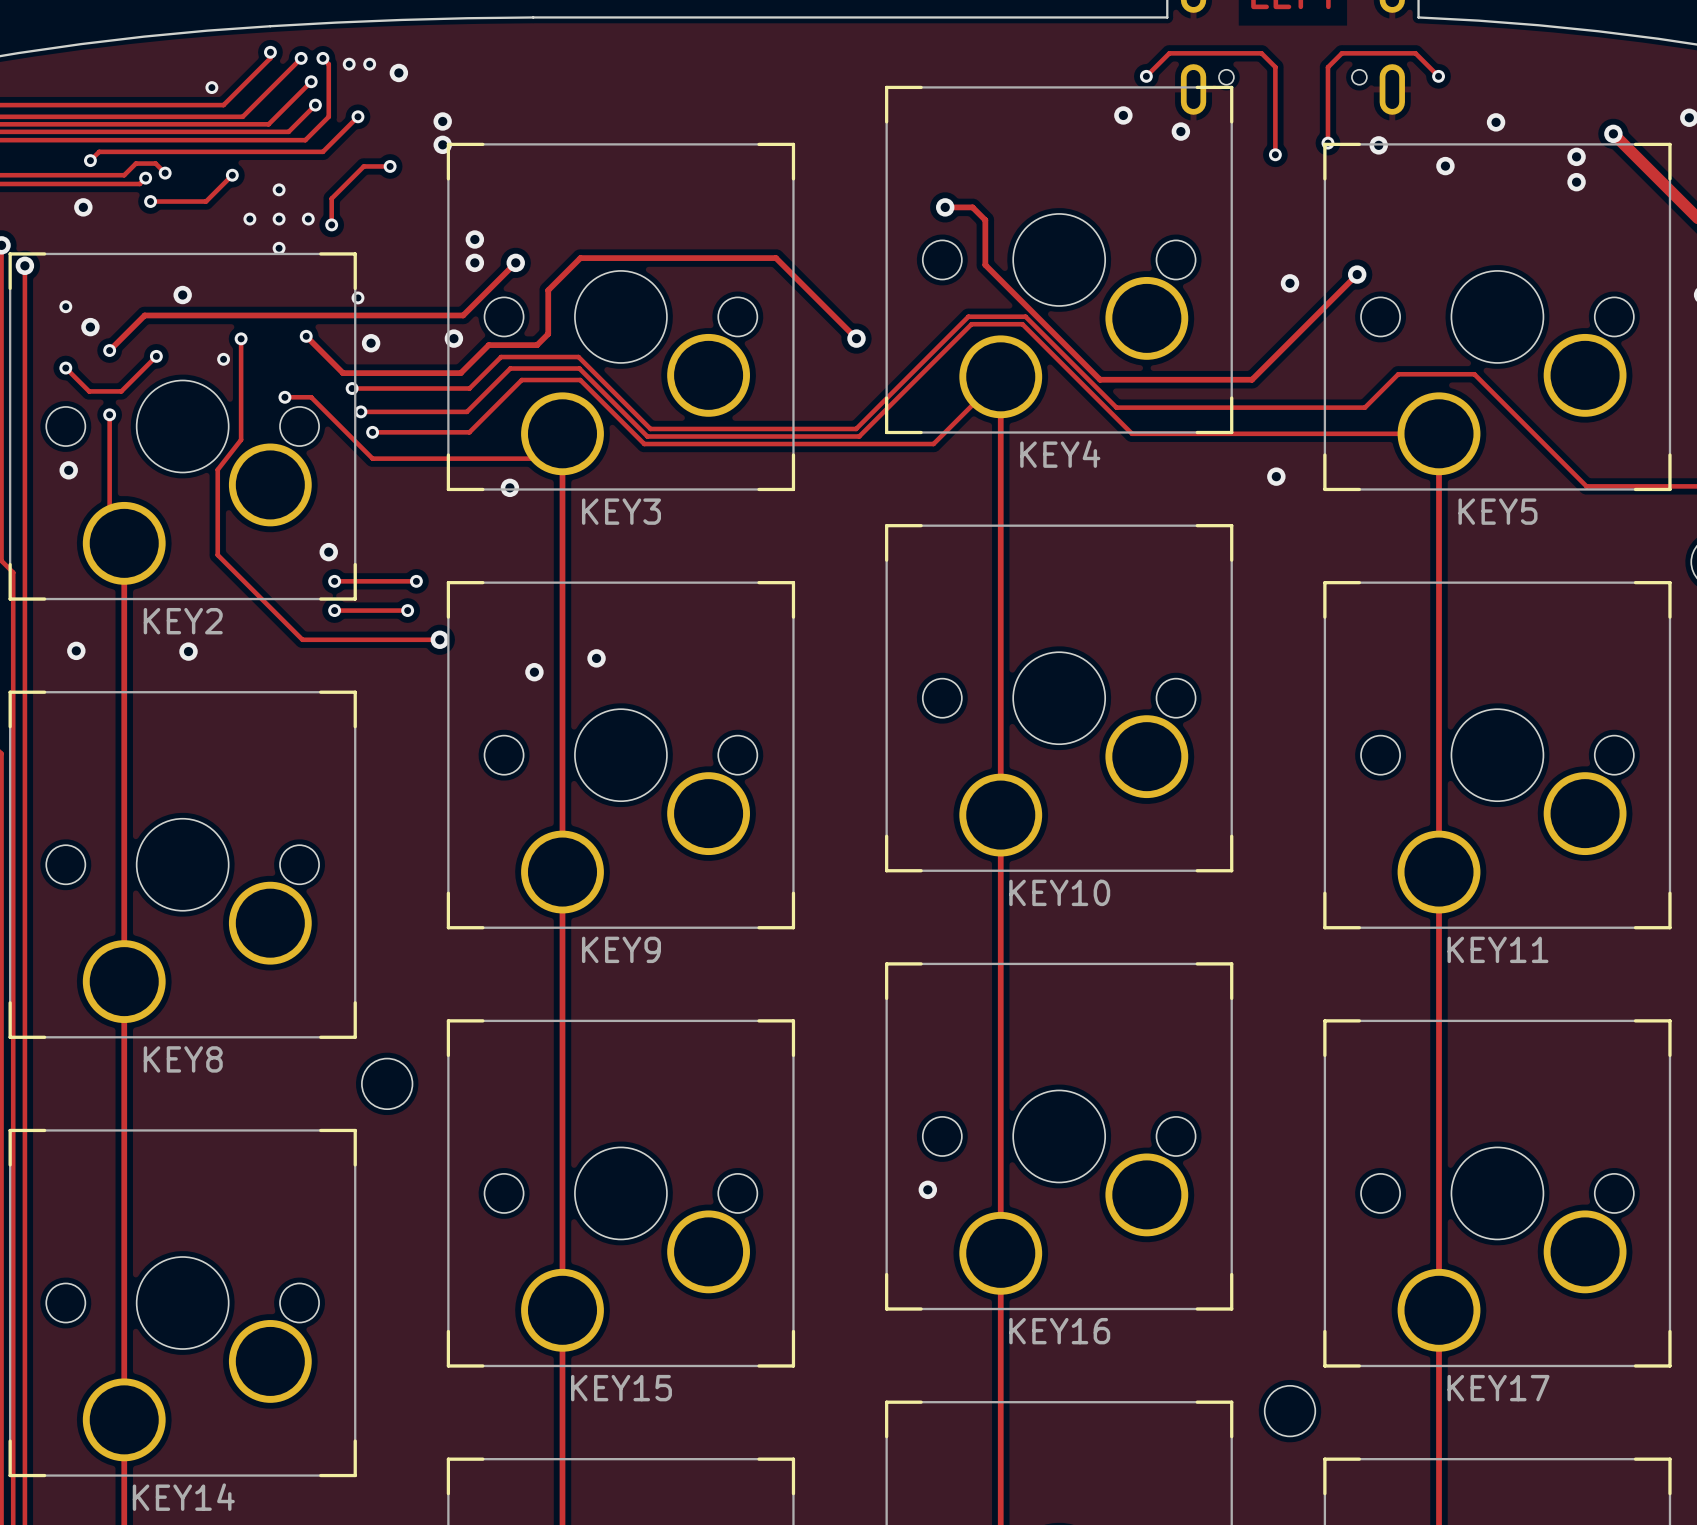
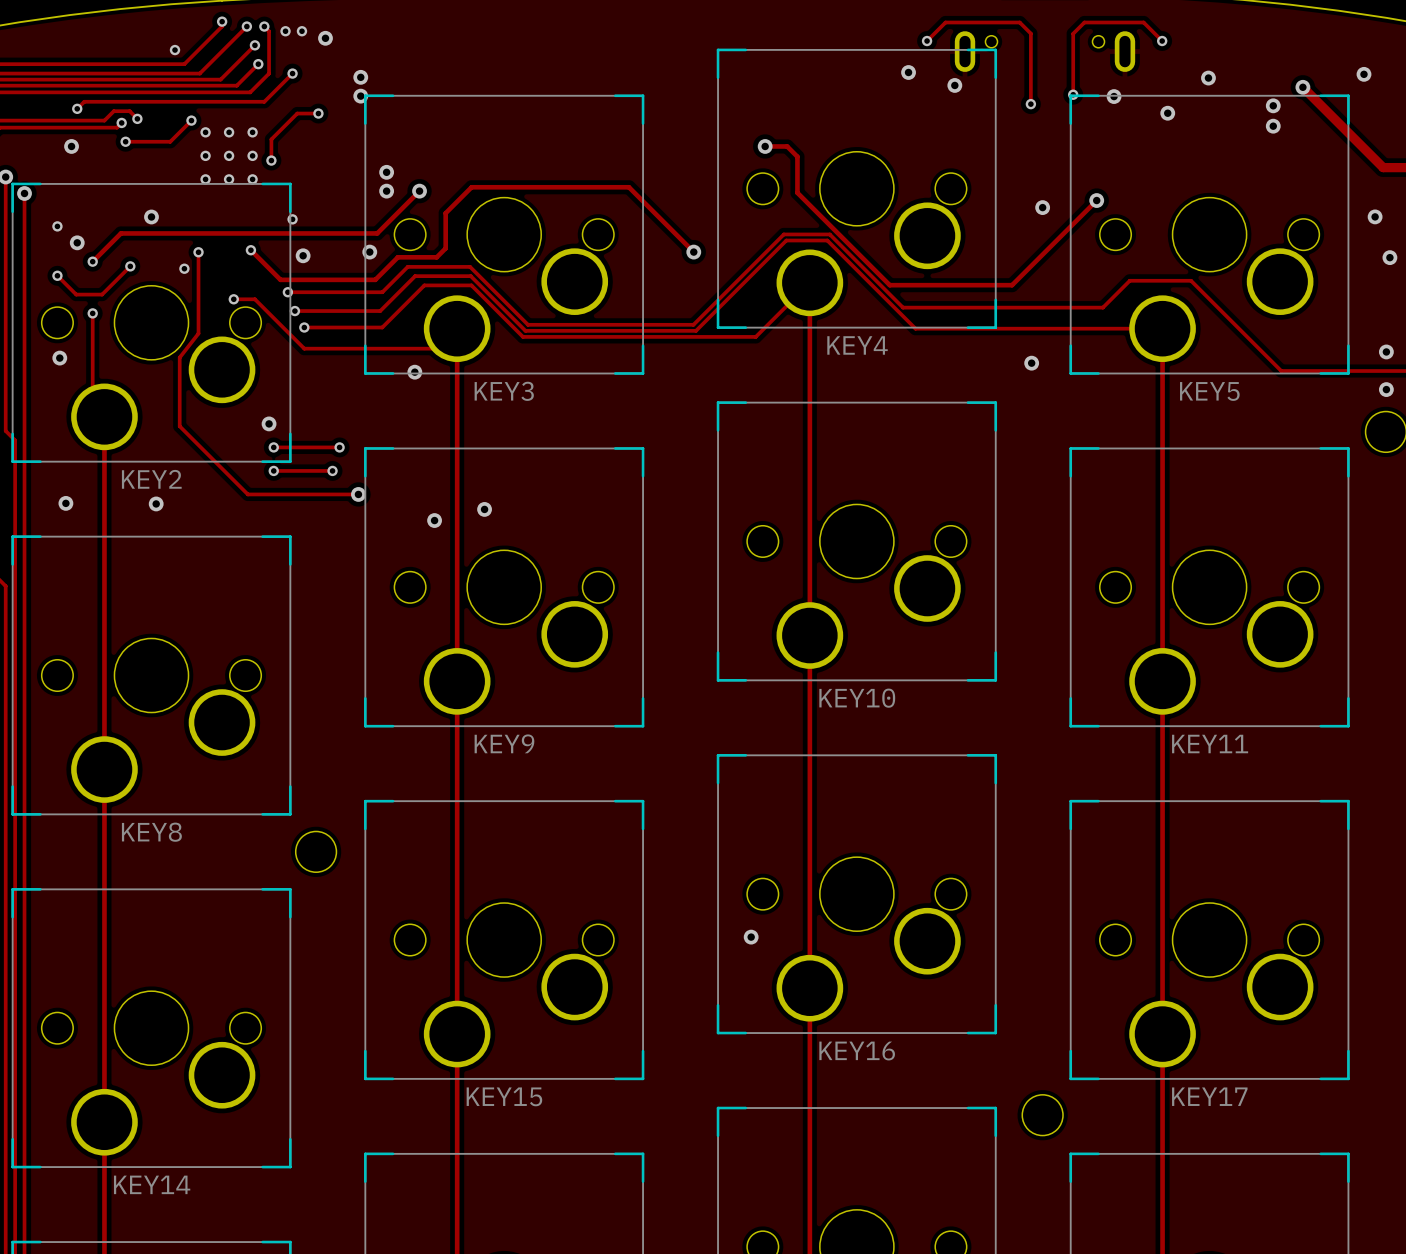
via: none -> (205, 132)
via: none -> (252, 132)
via: none -> (205, 179)
via: none -> (252, 179)

